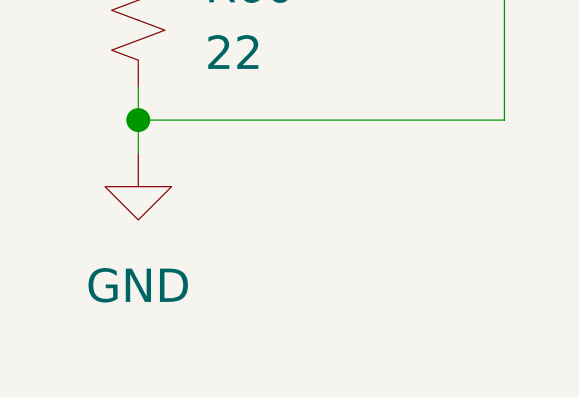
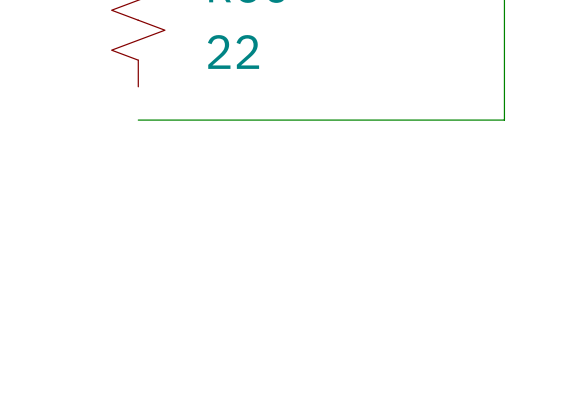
wire: (138, 86) (138, 153) -> none
junction: (138, 120) -> none
power symbol: GND (138, 186) -> none

